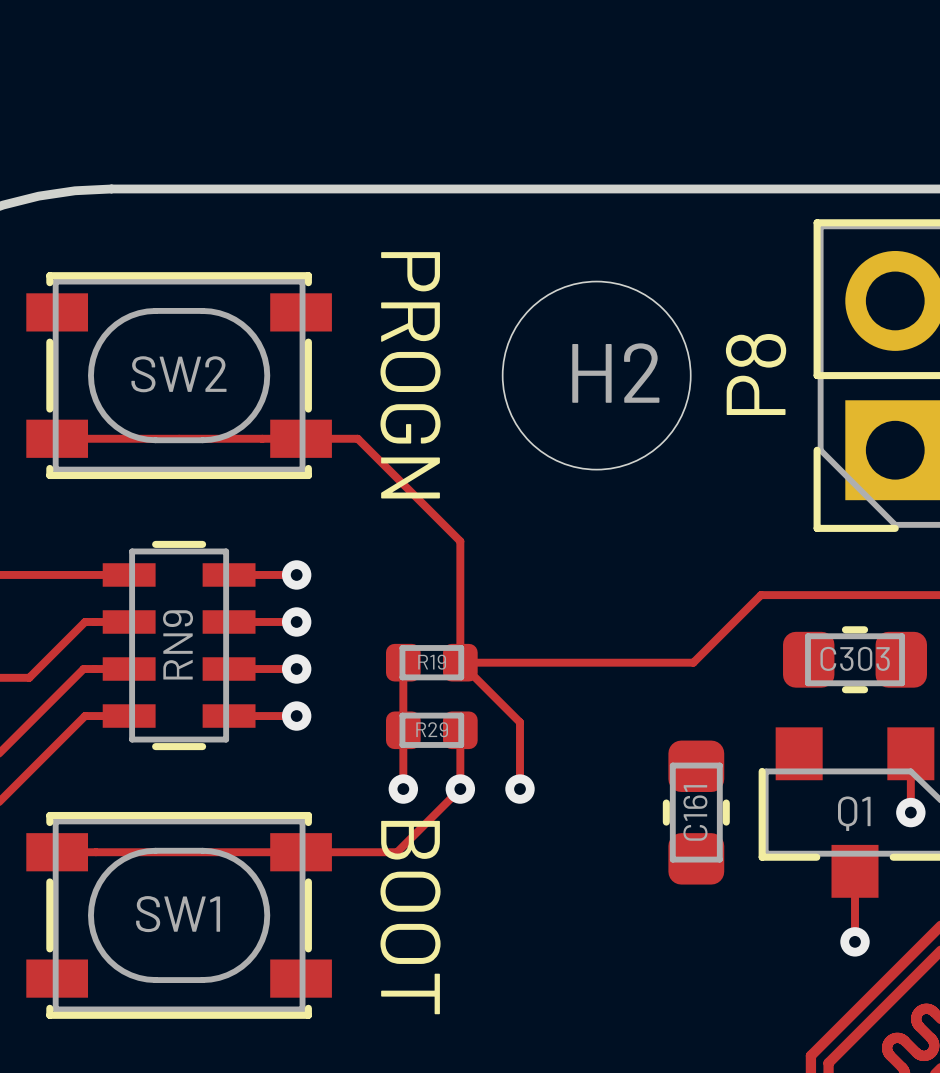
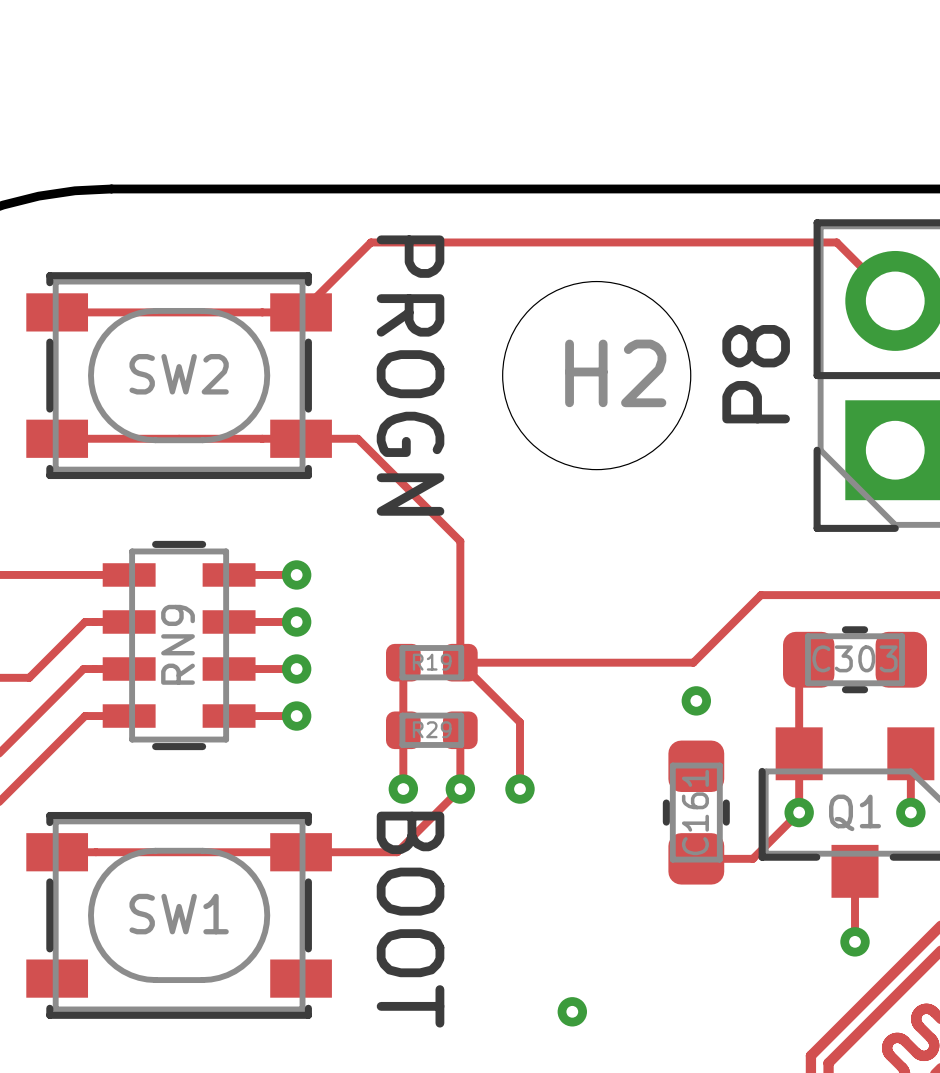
track: none -> (895, 300) (836, 242) (371, 242) (301, 312) (57, 312)
track: none -> (808, 659) (799, 669) (799, 812) (752, 858) (696, 858)
via: none -> (696, 700)
via: none -> (799, 812)
via: none -> (572, 1011)

